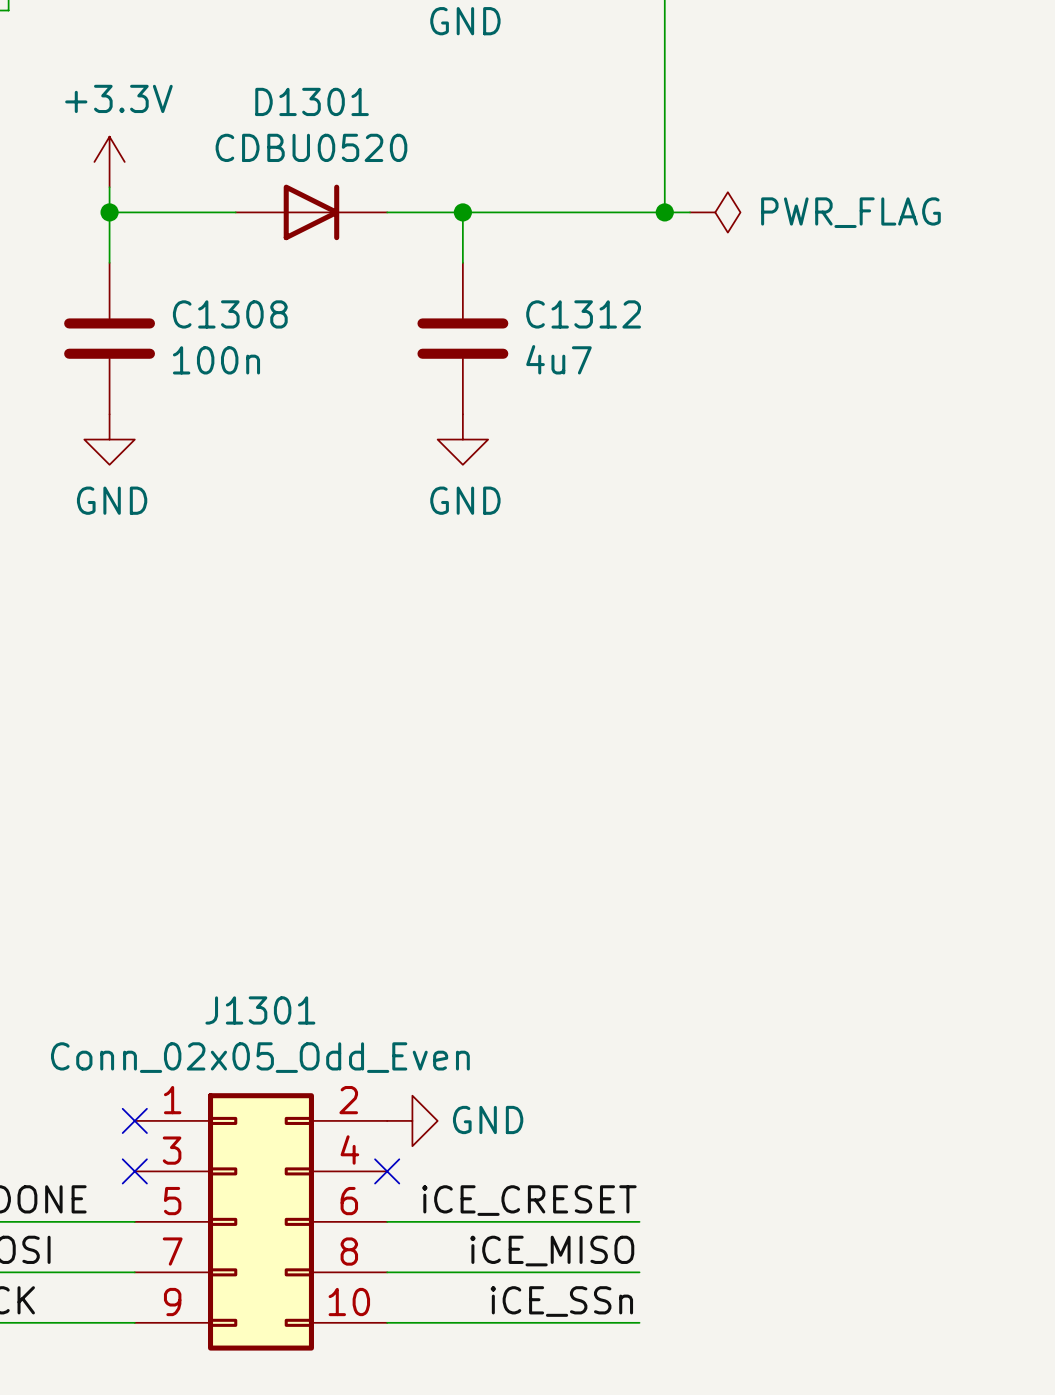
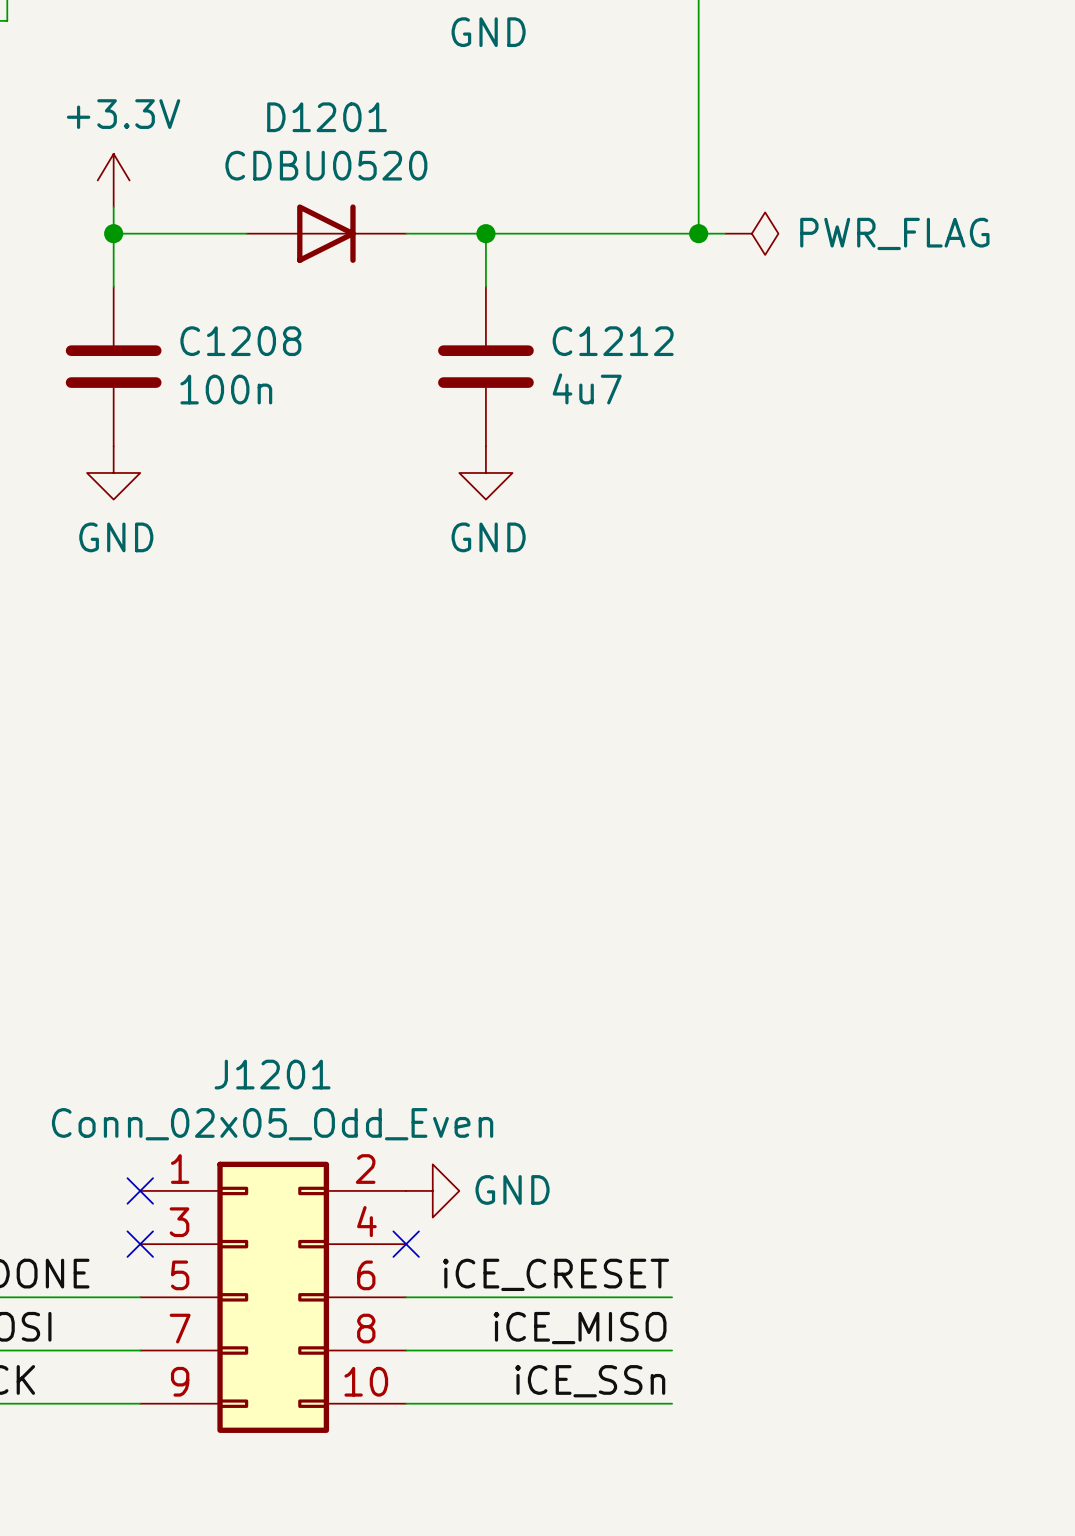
D1301 name: D1301 (312, 101) -> D1201 (327, 117)
C1308 name: C1308 (230, 314) -> C1208 (240, 341)
C1312 name: C1312 (583, 314) -> C1212 (613, 341)
J1301 name: J1301 (260, 1010) -> J1201 (272, 1074)

